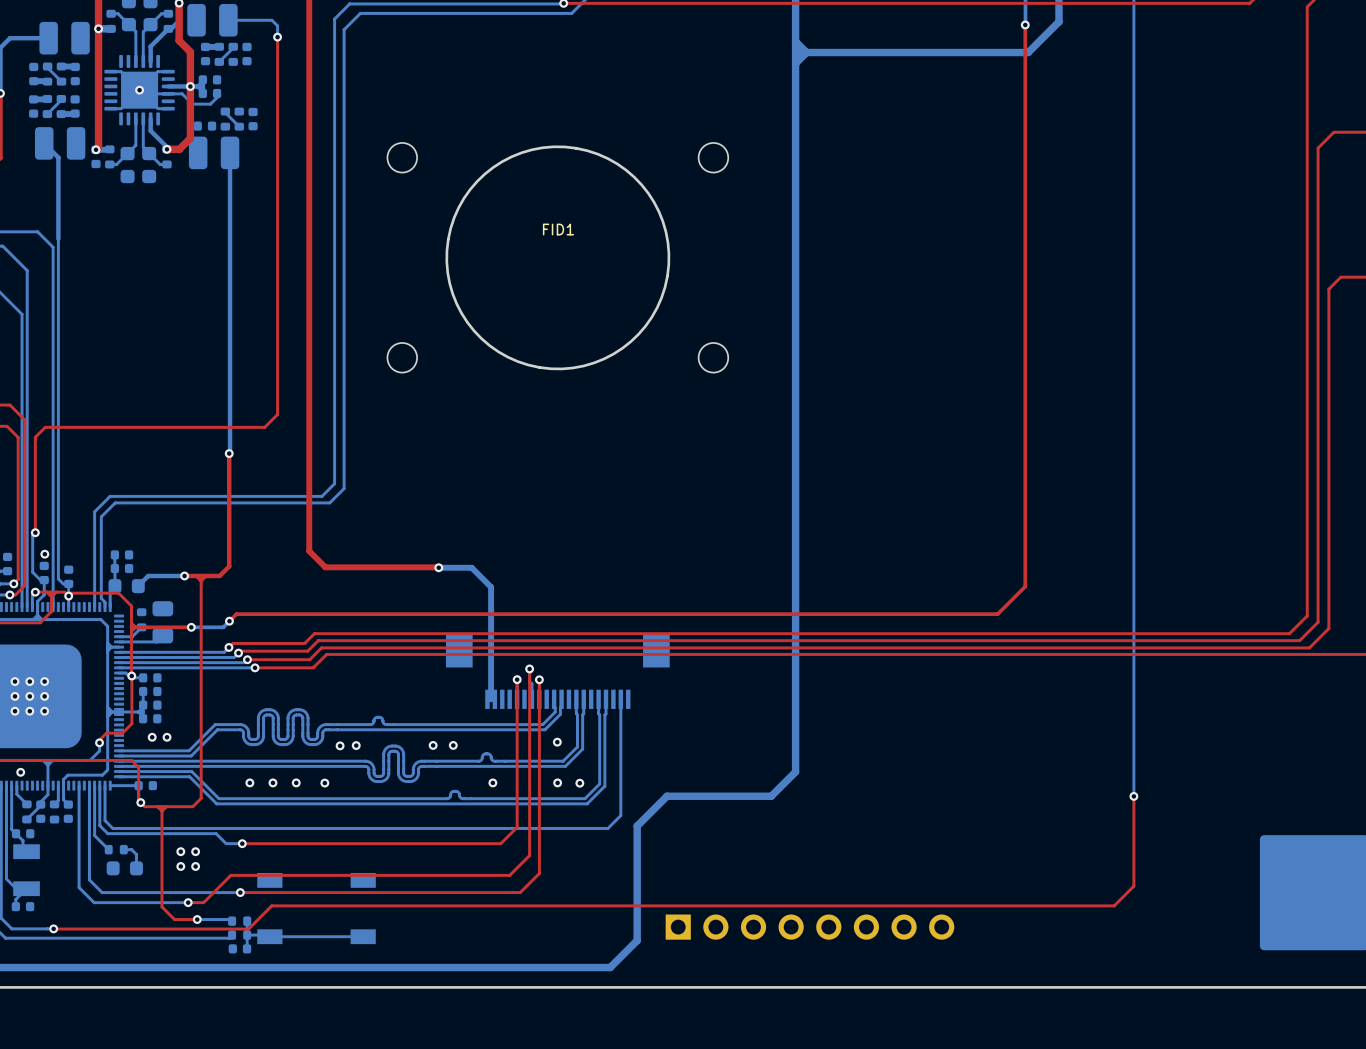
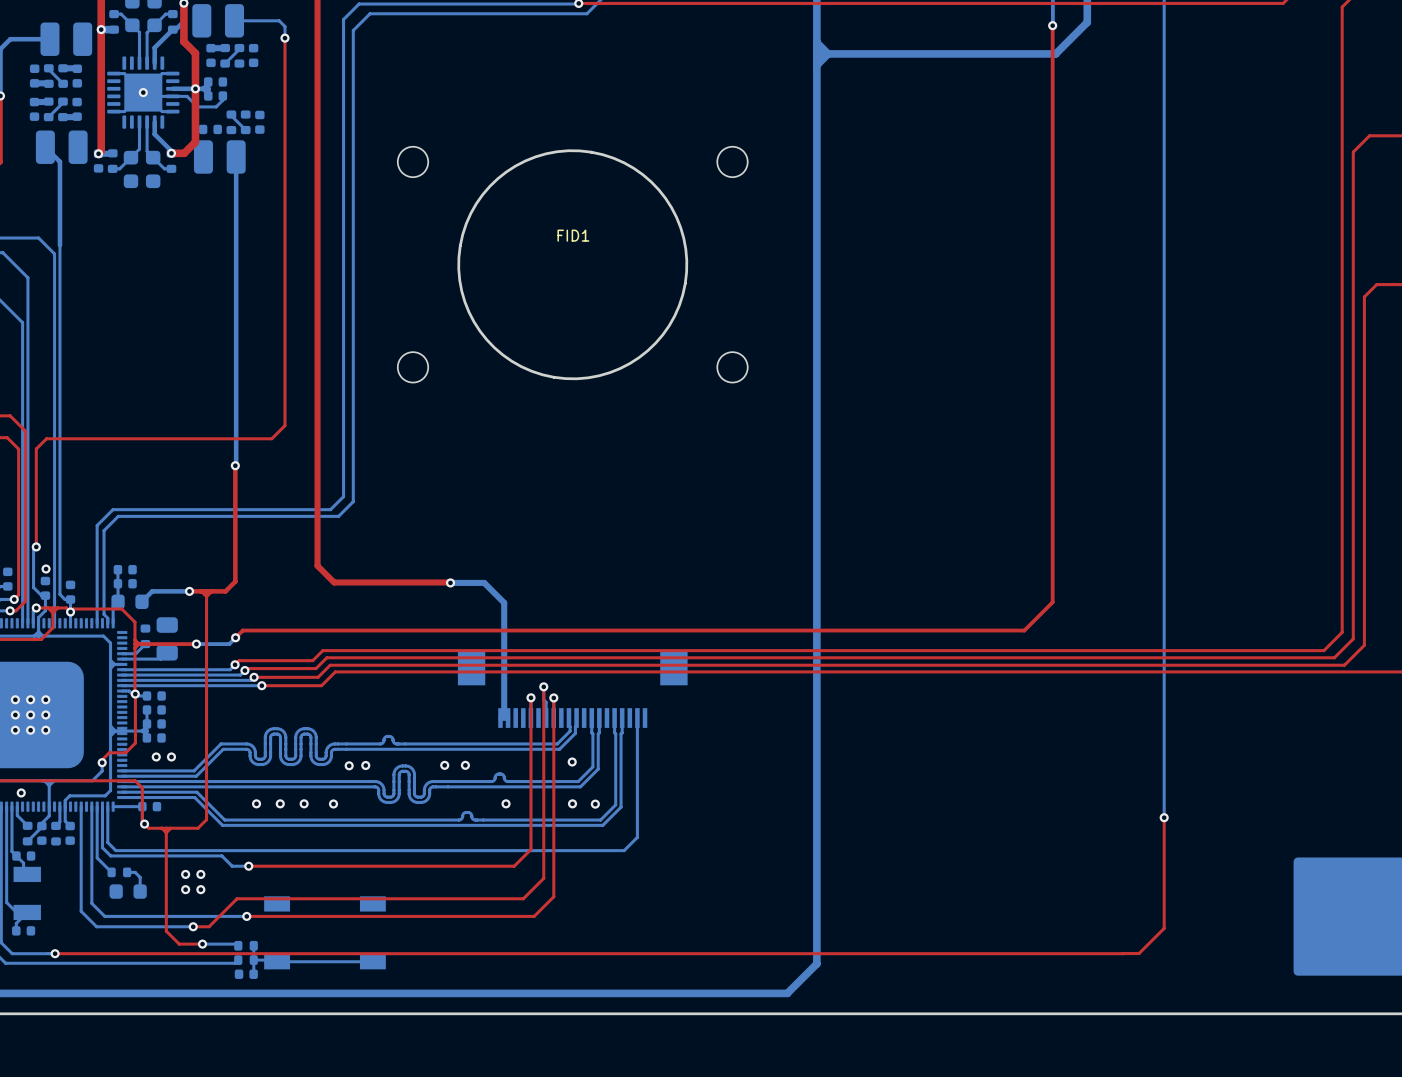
bottom track: (795, 771) (771, 796) (666, 796) (637, 826) (637, 940) (610, 967) -> (816, 792) (816, 963) (787, 993) (626, 993)
top track: (1133, 886) (1114, 905) (271, 905) (248, 929) (53, 929) -> (1123, 953) (55, 953)
top track: none -> (1164, 909) (1164, 928) (1139, 953) (1123, 953)
part: (809, 927) -> none

